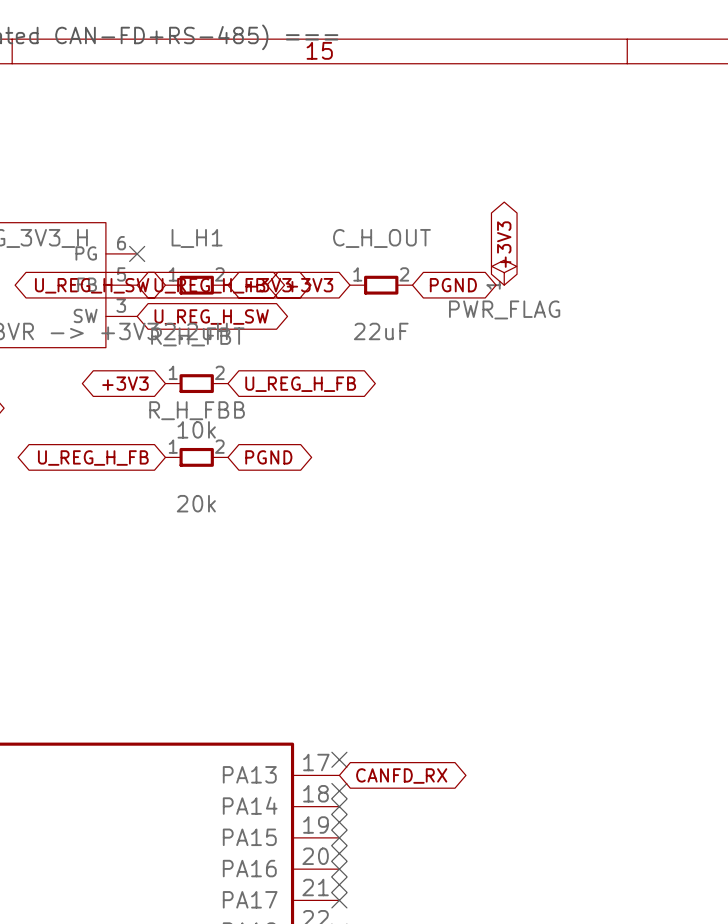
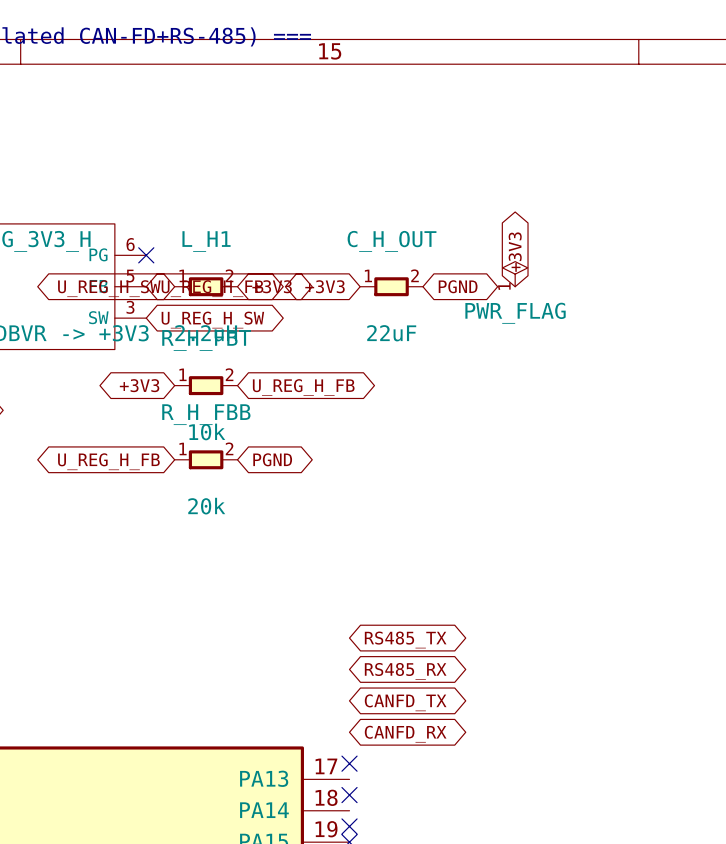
global label: none -> RS485_TX (405, 639)
global label: none -> RS485_RX (405, 671)
global label: none -> CANFD_TX (405, 702)
global label position: CANFD_RX (401, 775) -> CANFD_RX (405, 734)
no-connect mark: (339, 806) -> none

